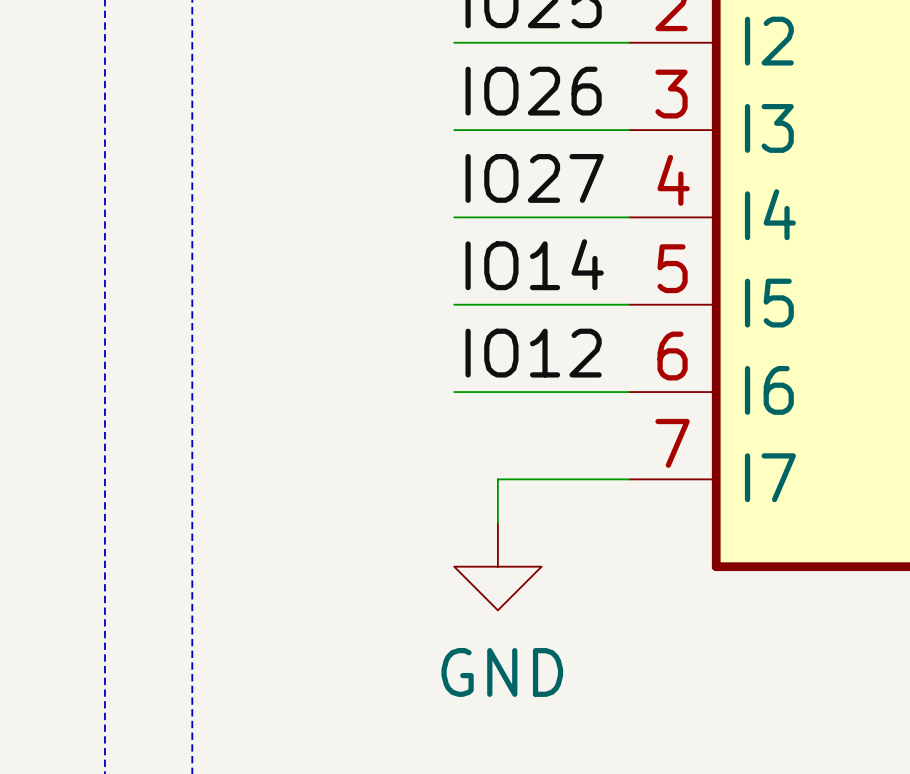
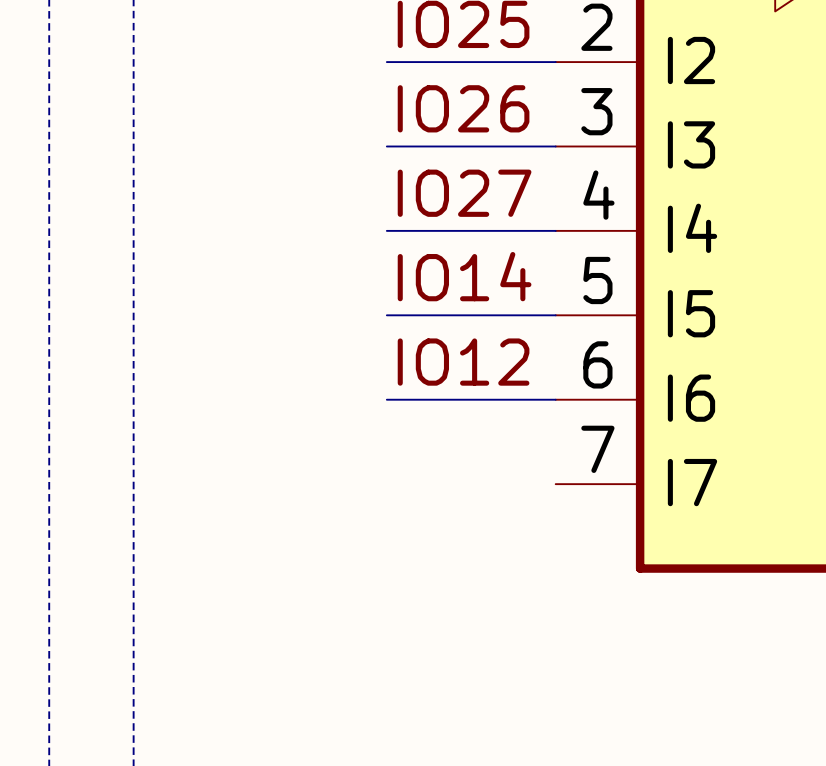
wire: (628, 479) (497, 479) (497, 523) -> none
power symbol: GND (497, 566) -> none

